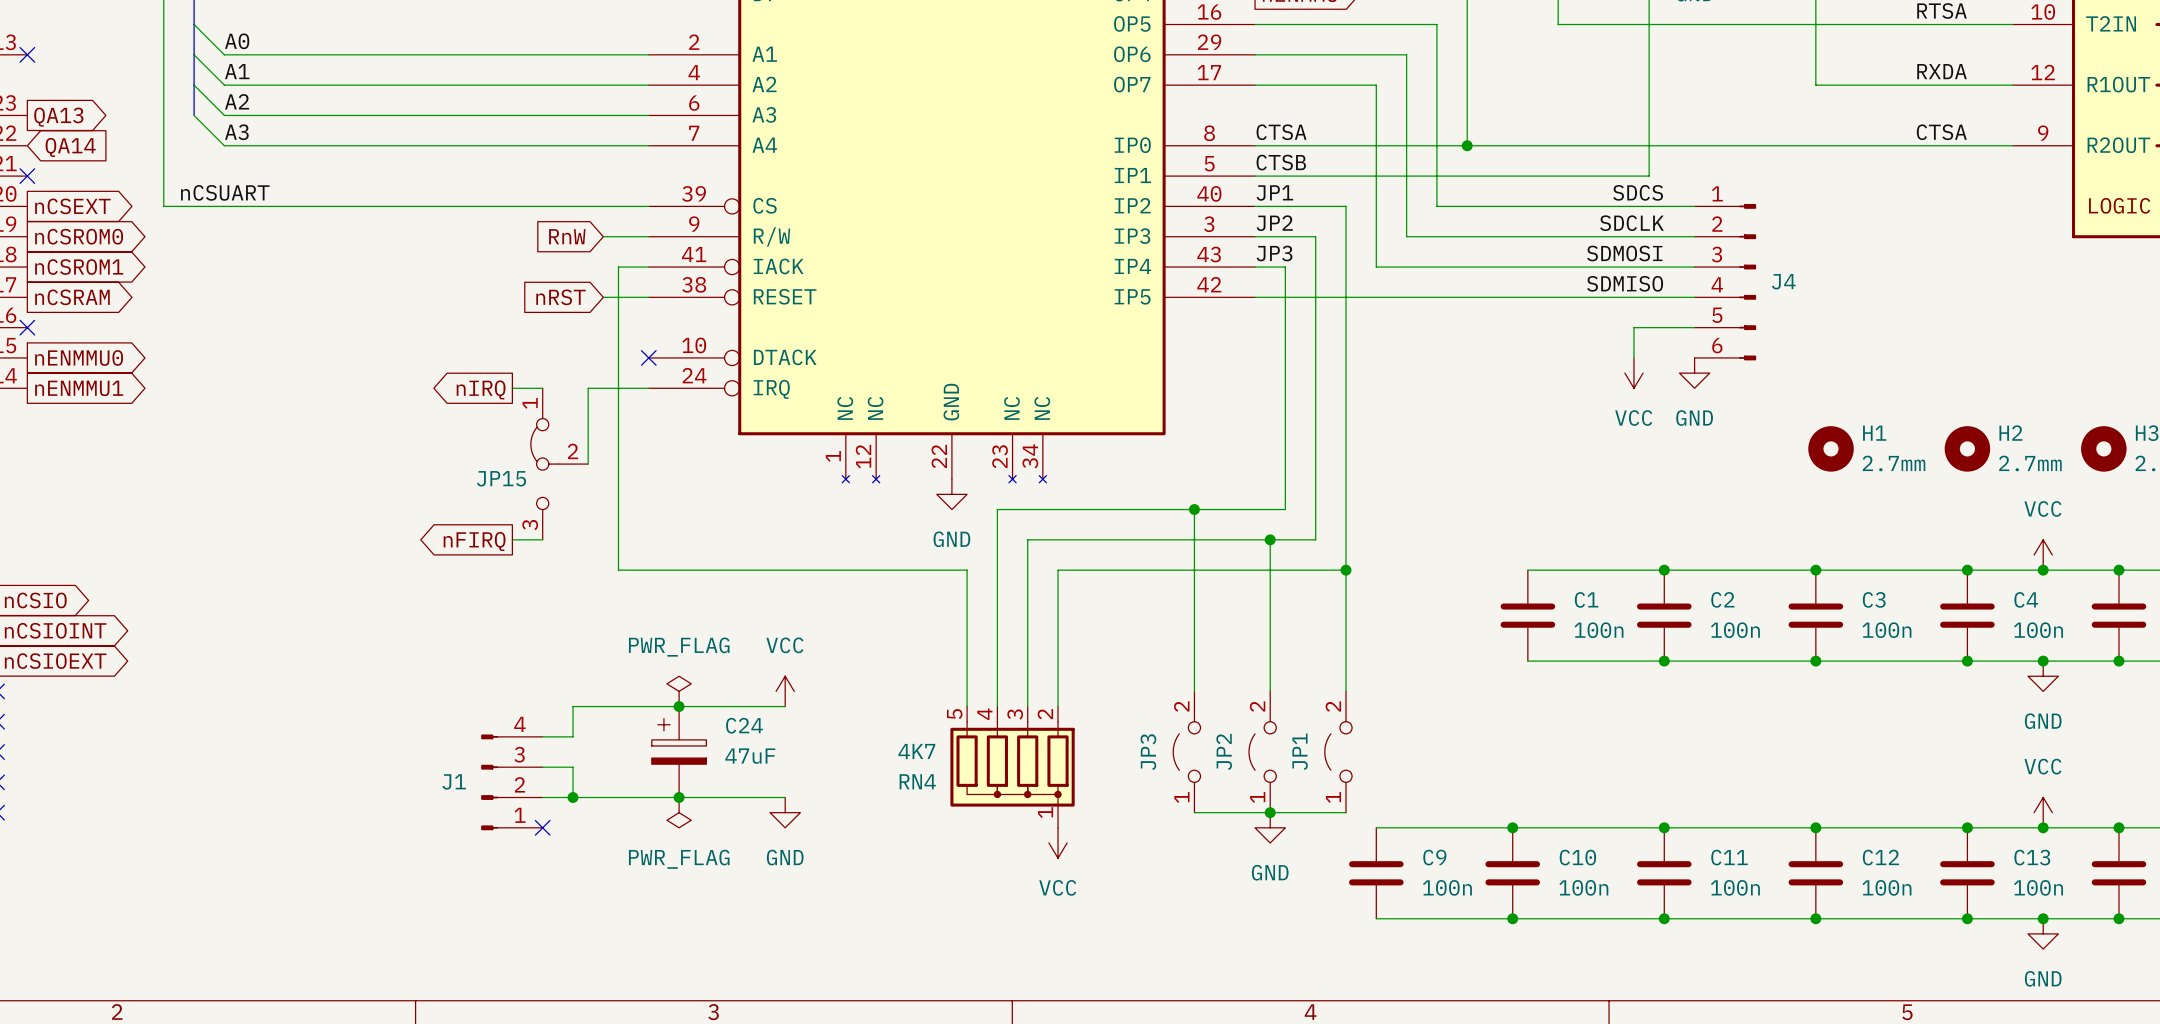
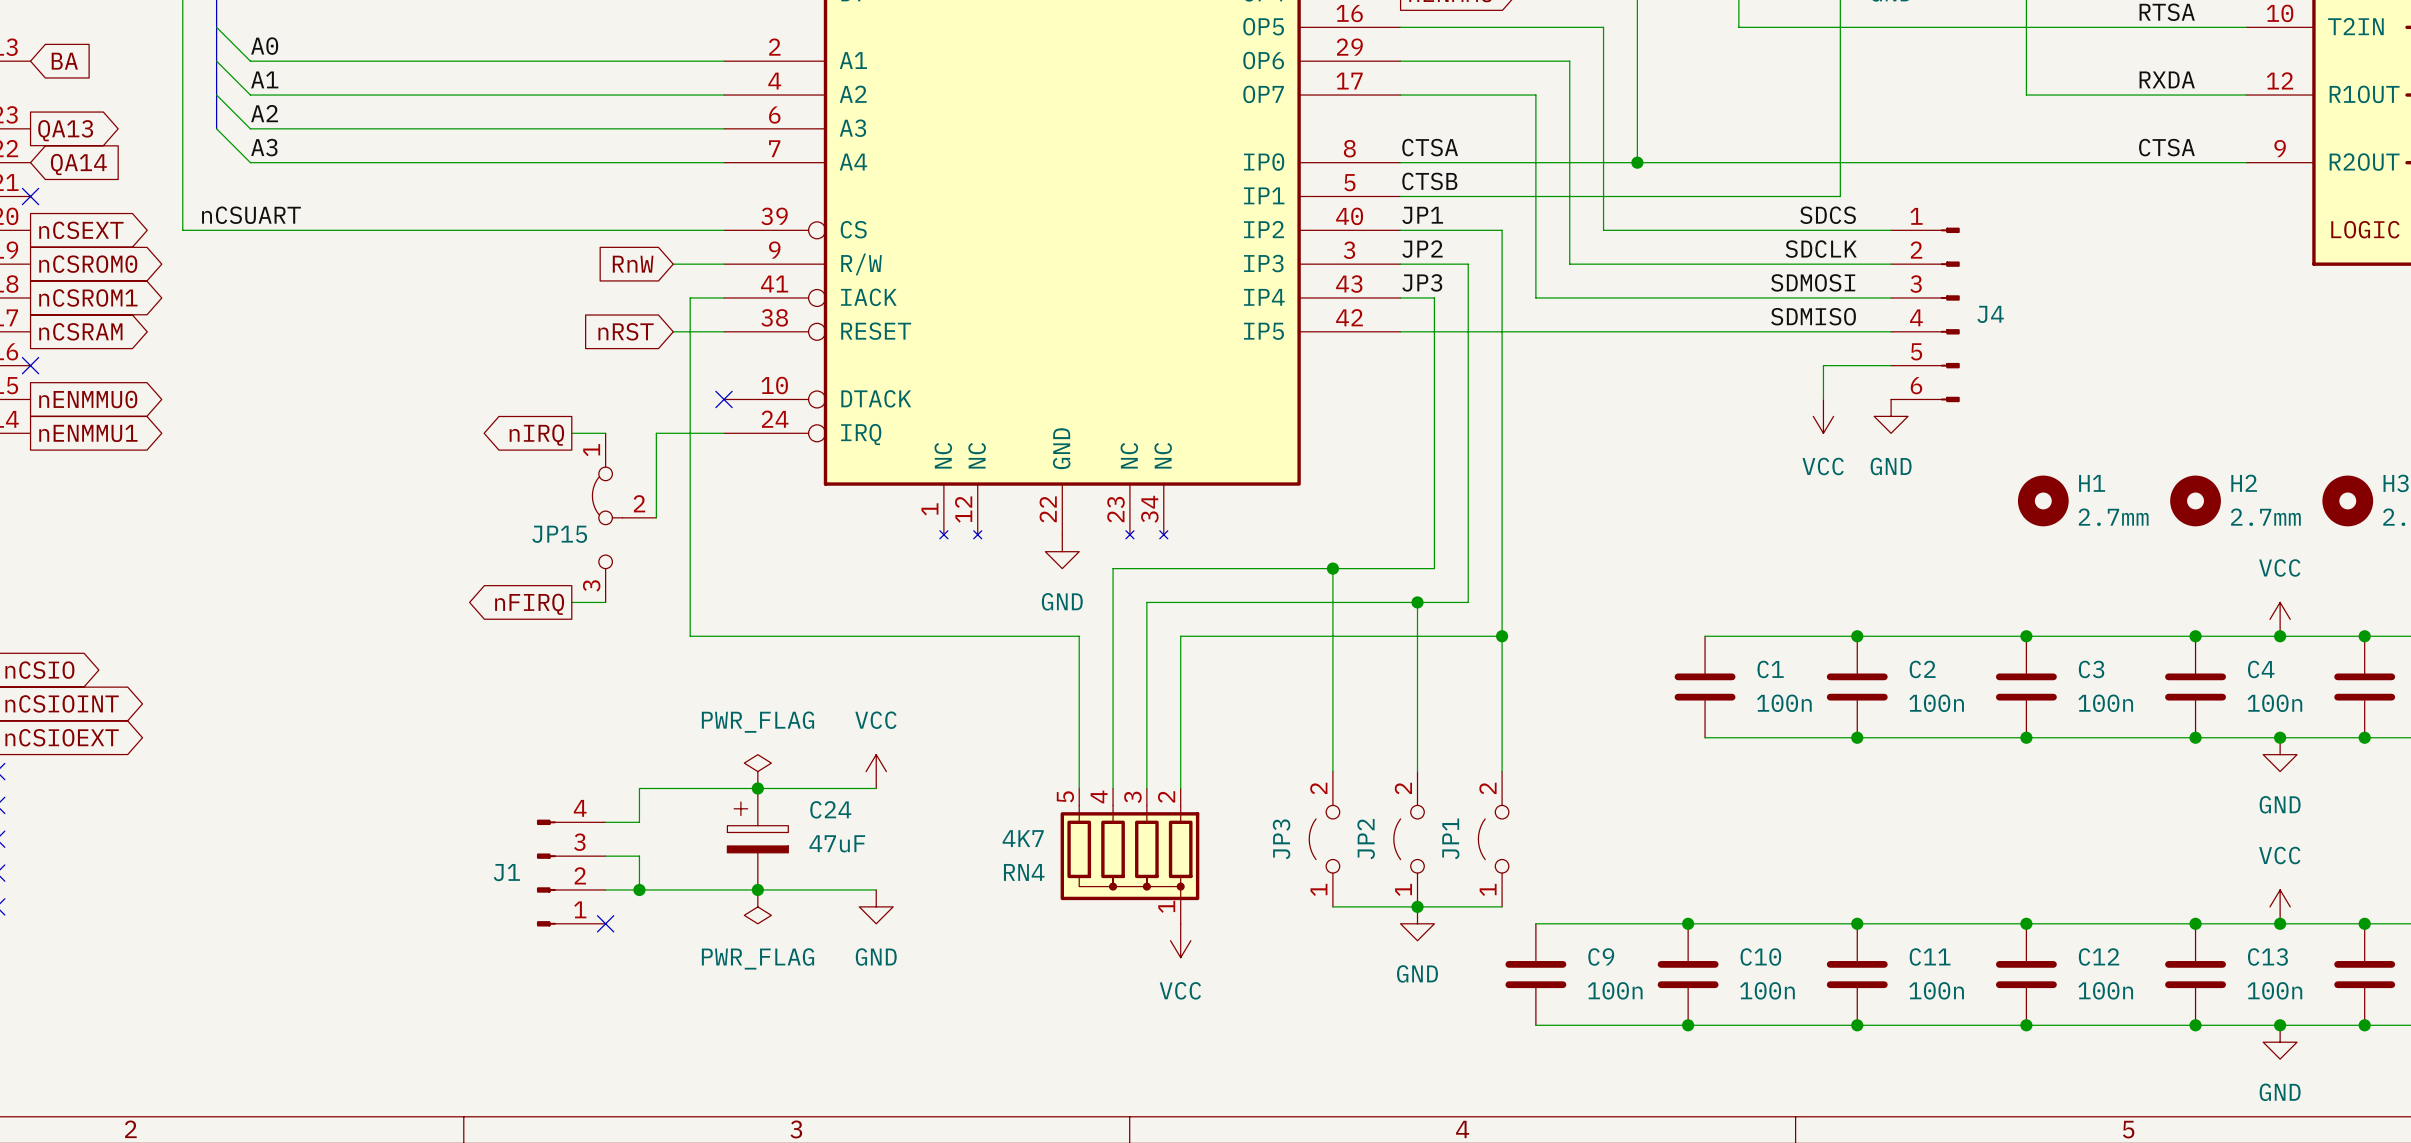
no-connect mark: (27, 54) -> none
global label: none -> BA (64, 61)

